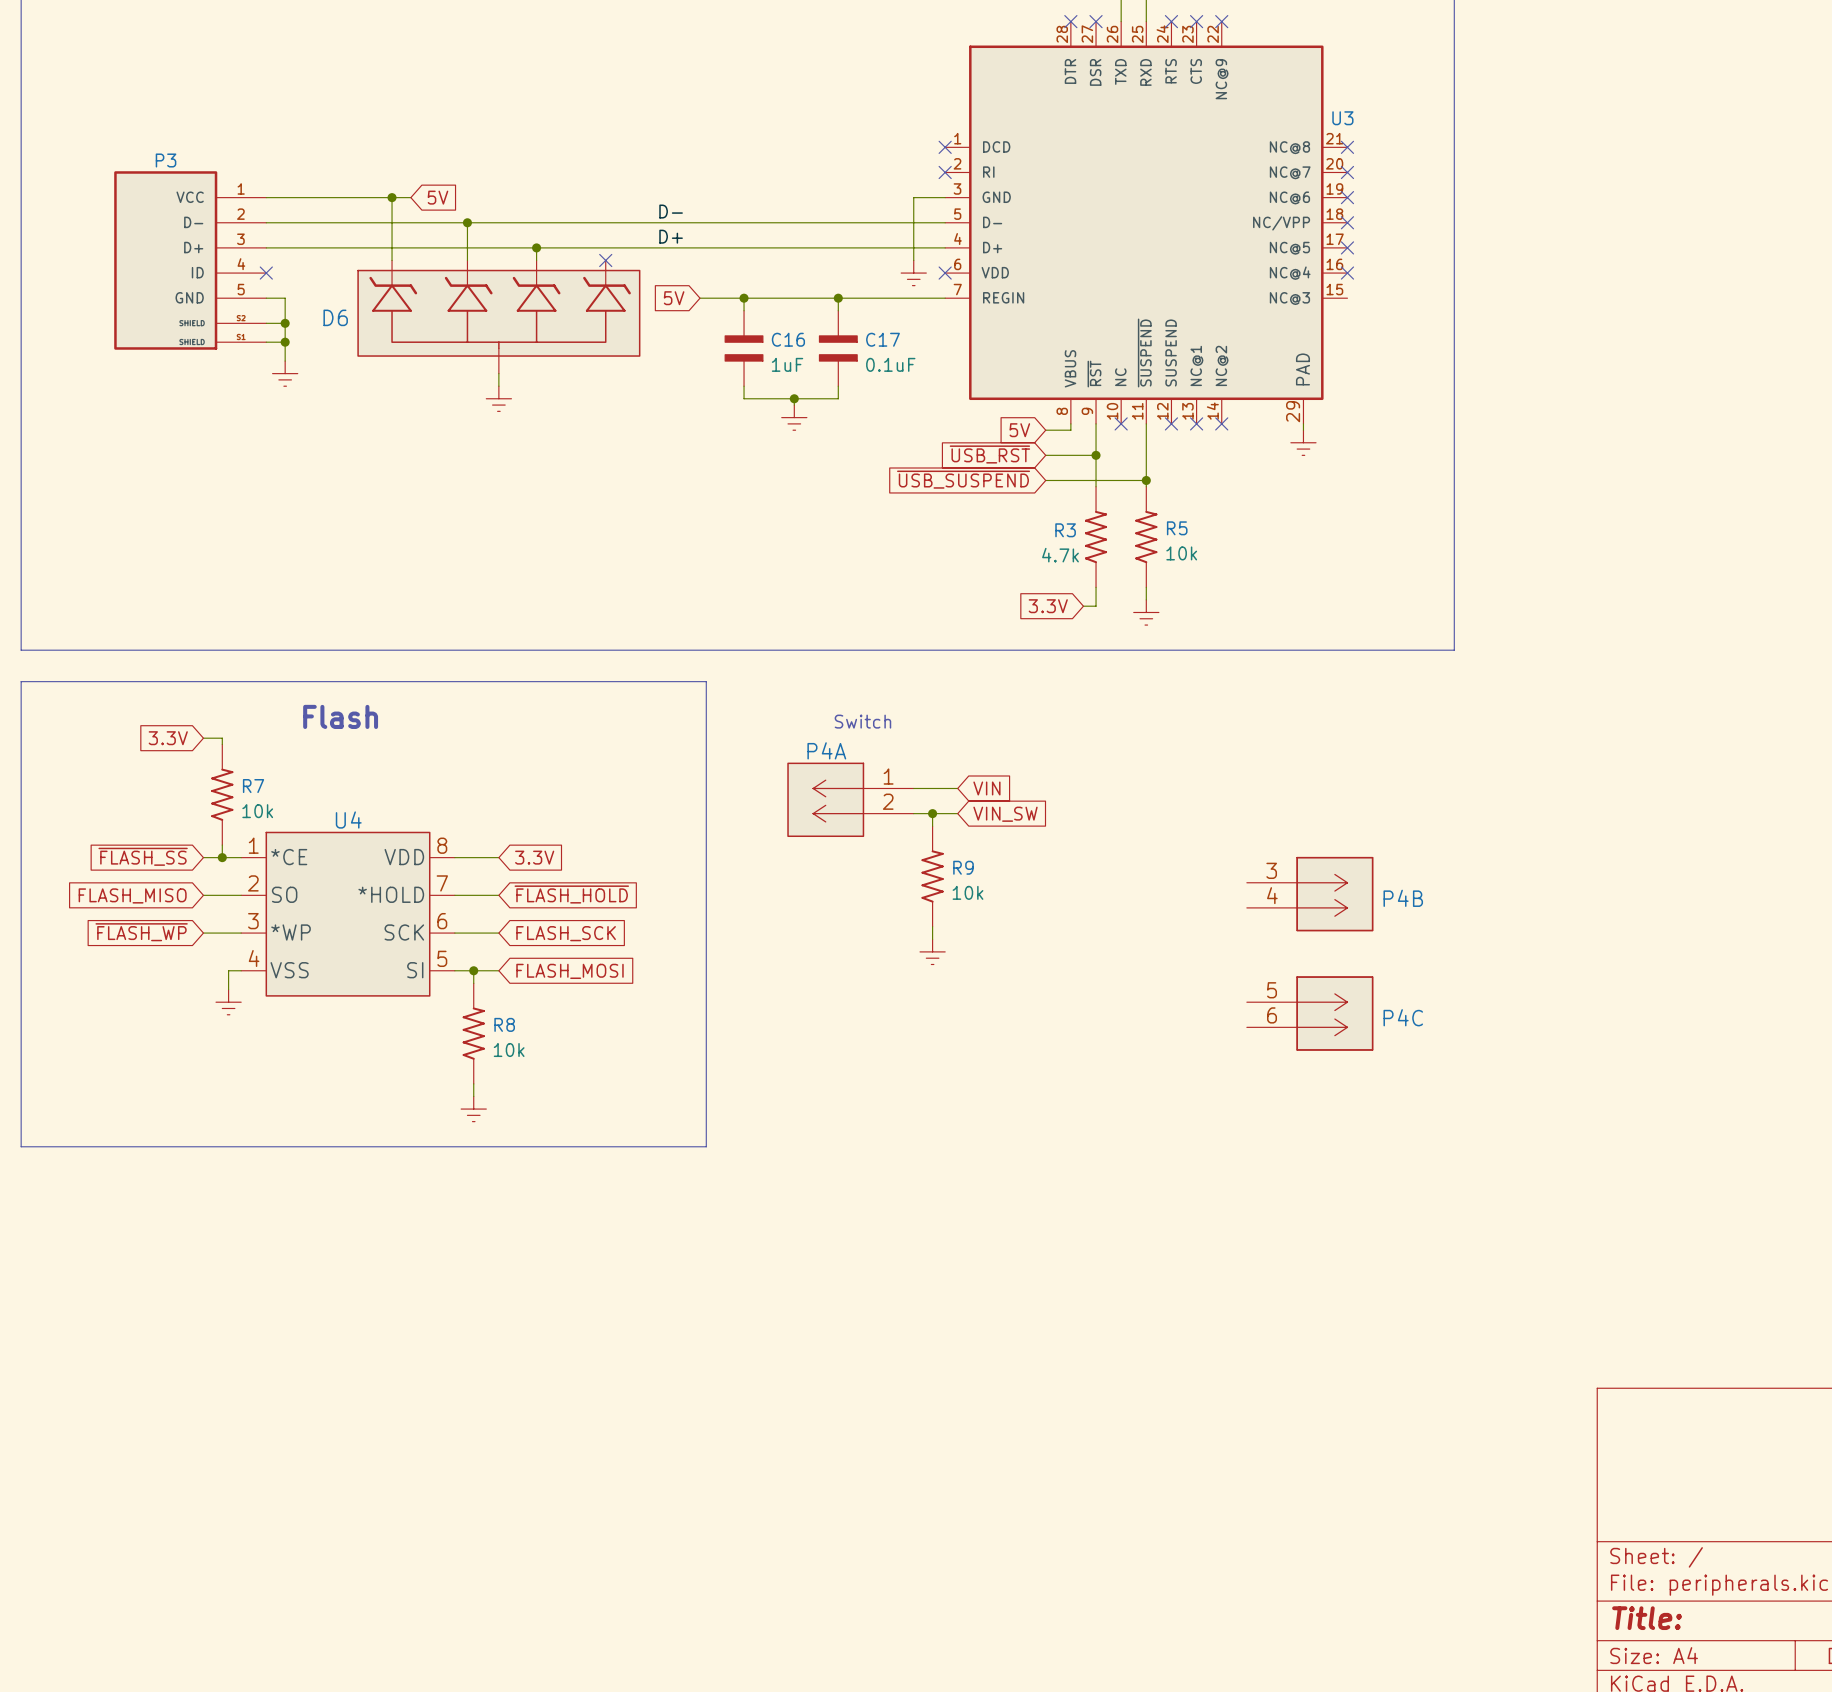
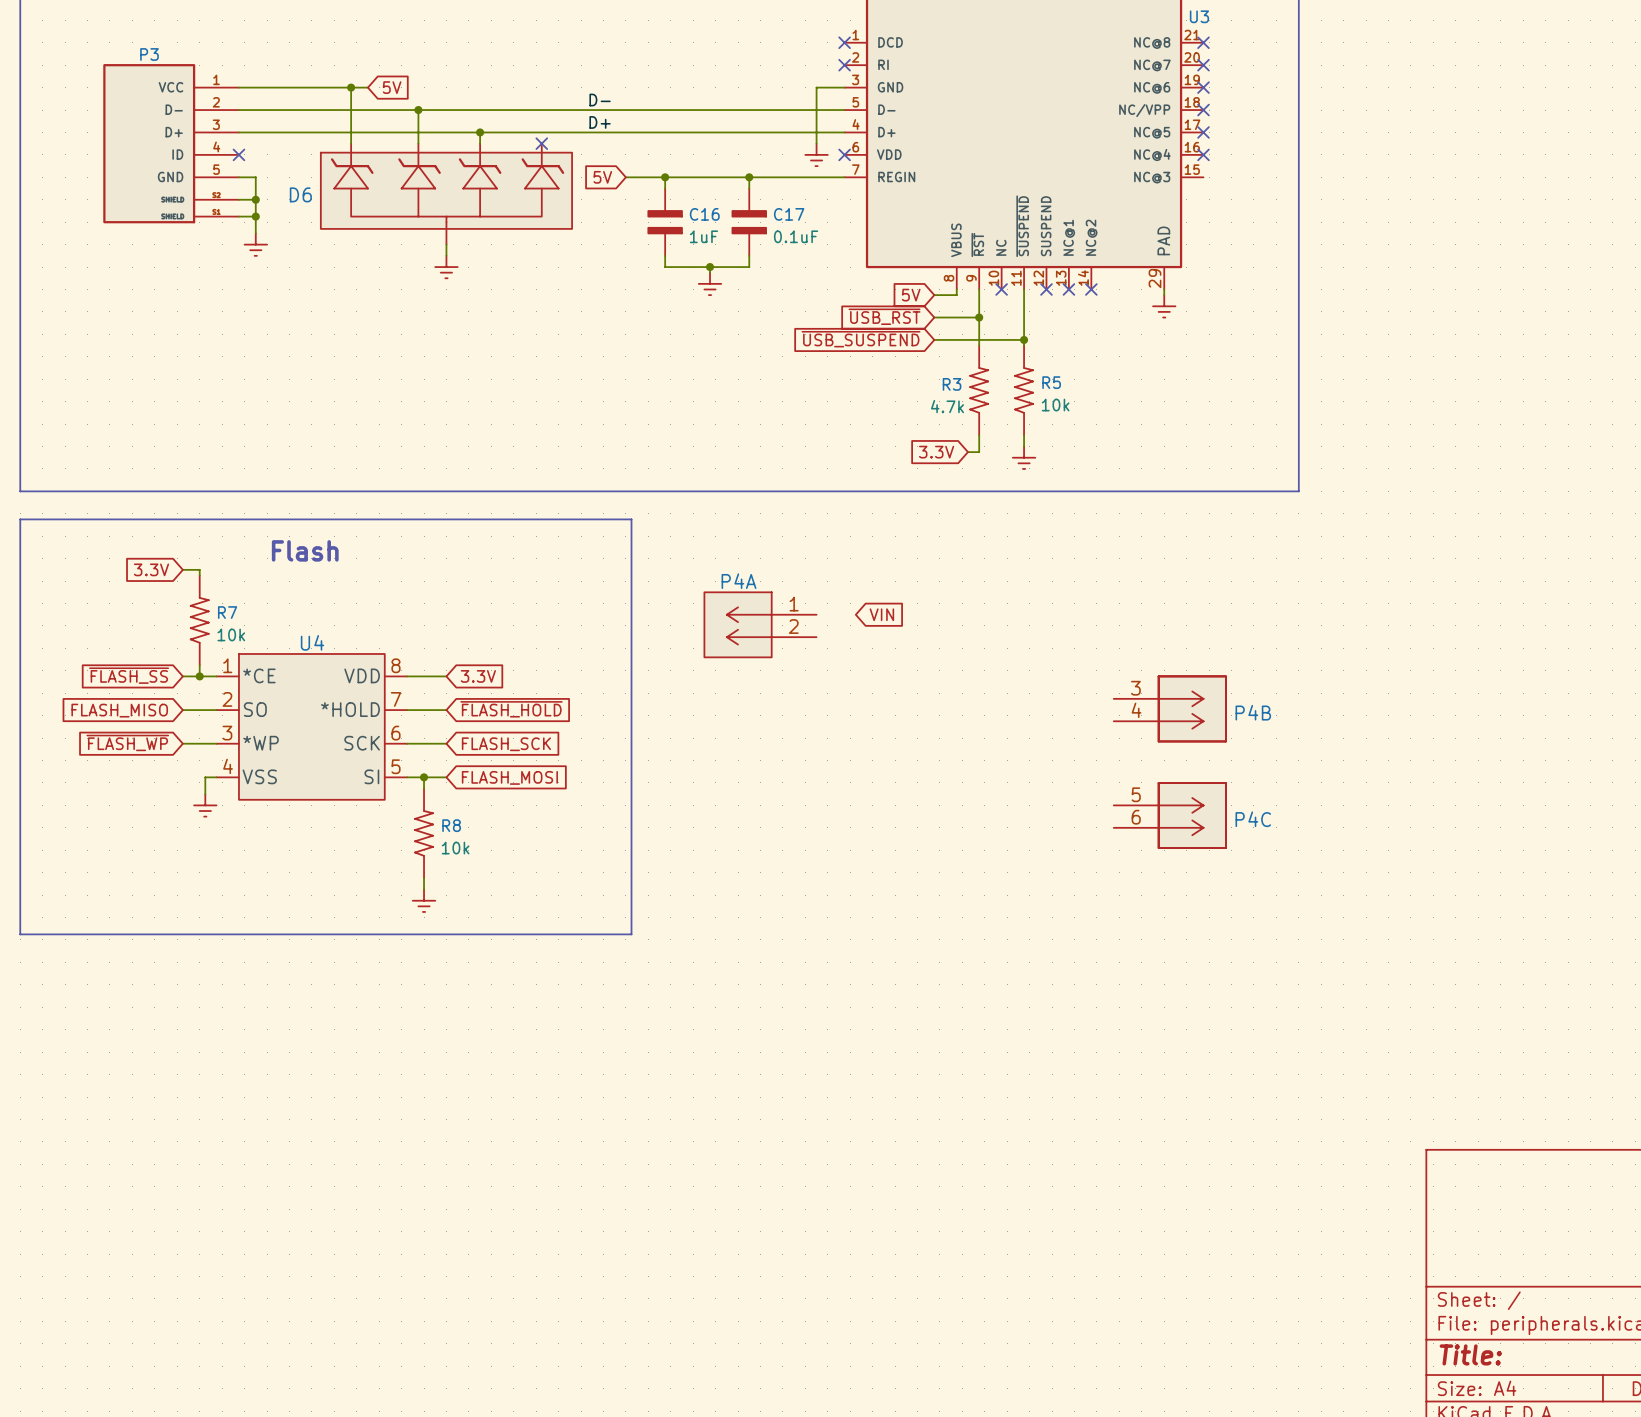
text: Switch (862, 721) -> none
wire: (913, 788) (957, 788) -> none
wire: (913, 813) (957, 813) -> none
wire: (932, 813) (932, 826) -> none
junction: (932, 813) -> none
global label: VIN_SW (1005, 814) -> none
R9: 10k (932, 876) -> none
wire: (932, 926) (932, 939) -> none
power symbol: (932, 951) -> none

